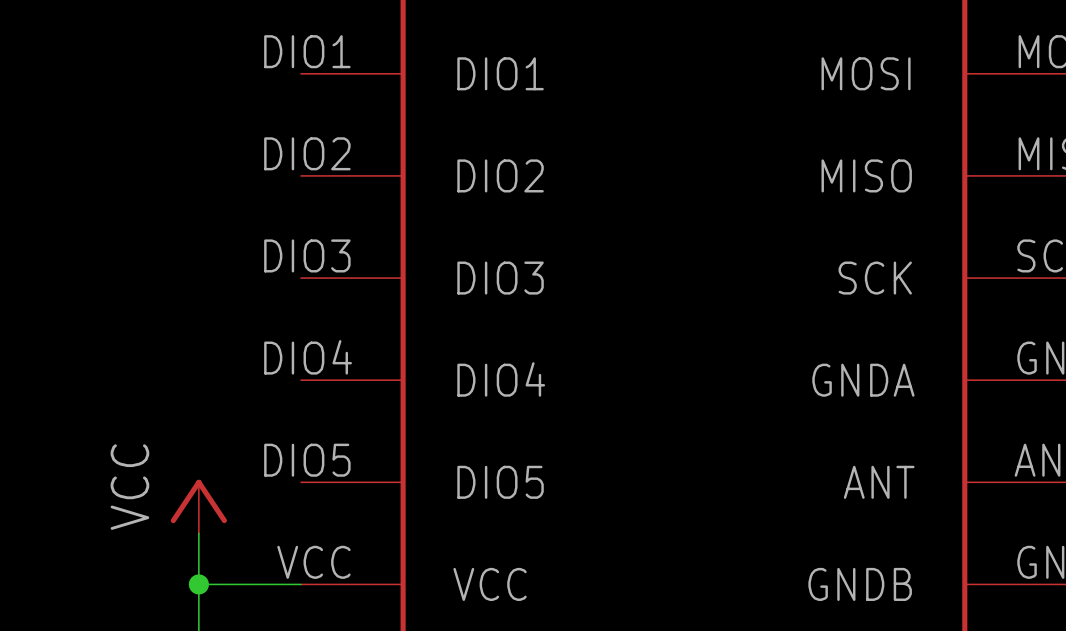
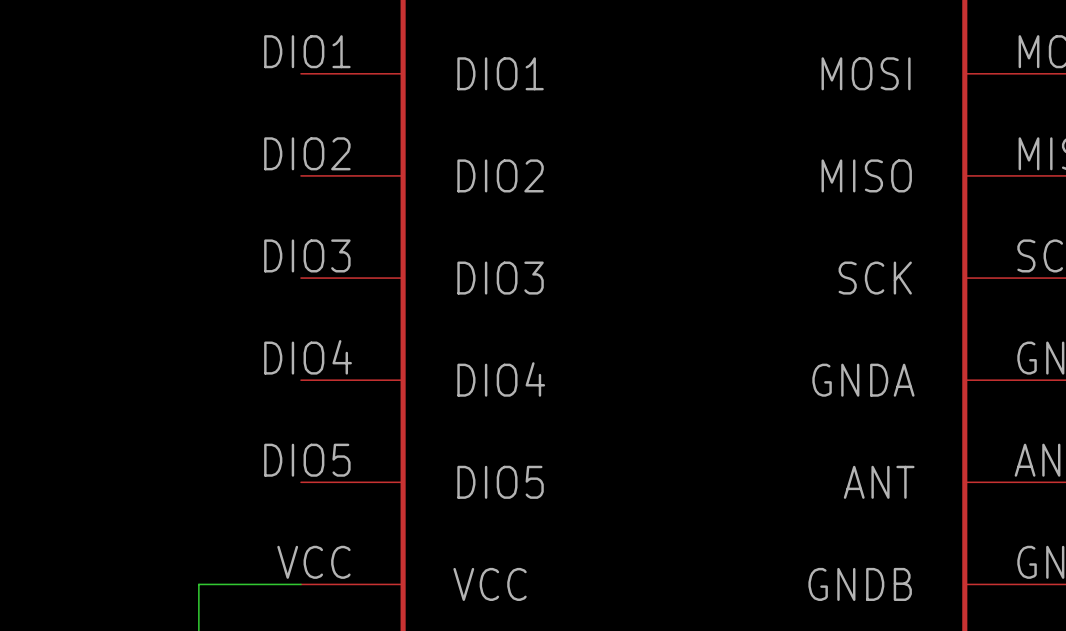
power symbol: VCC (198, 506) -> none
wire: (198, 533) (198, 584) -> none
junction: (198, 584) -> none

